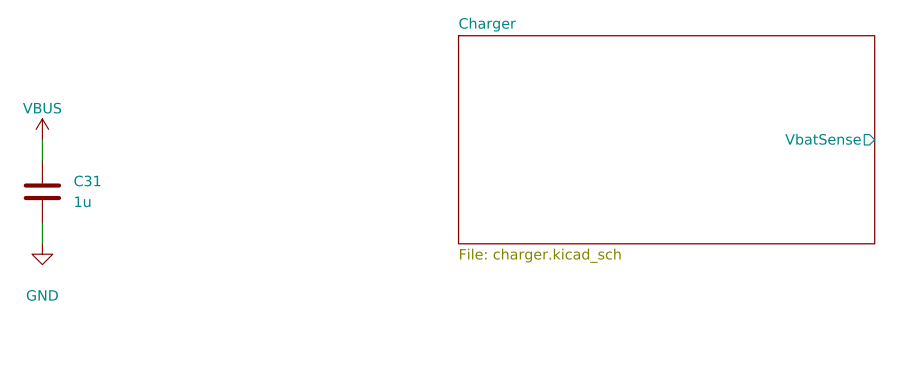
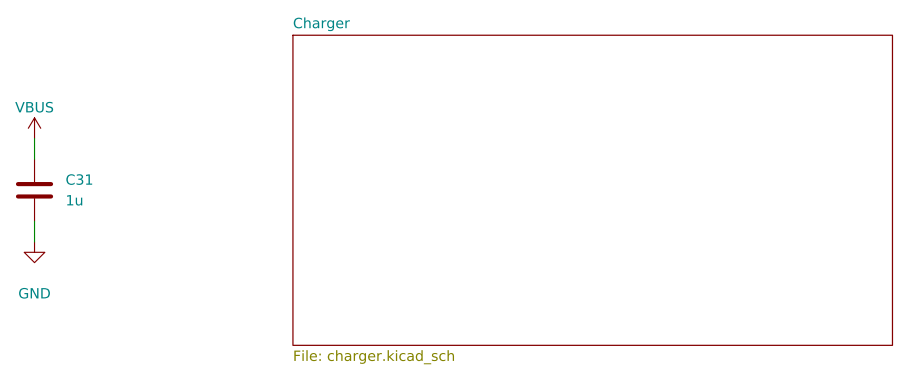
sheet Charger: File: charger.kicad_sch (666, 139) -> none
sheet pin: VbatSense (823, 139) -> none
sheet Charger: none -> File: charger.kicad_sch (592, 190)

